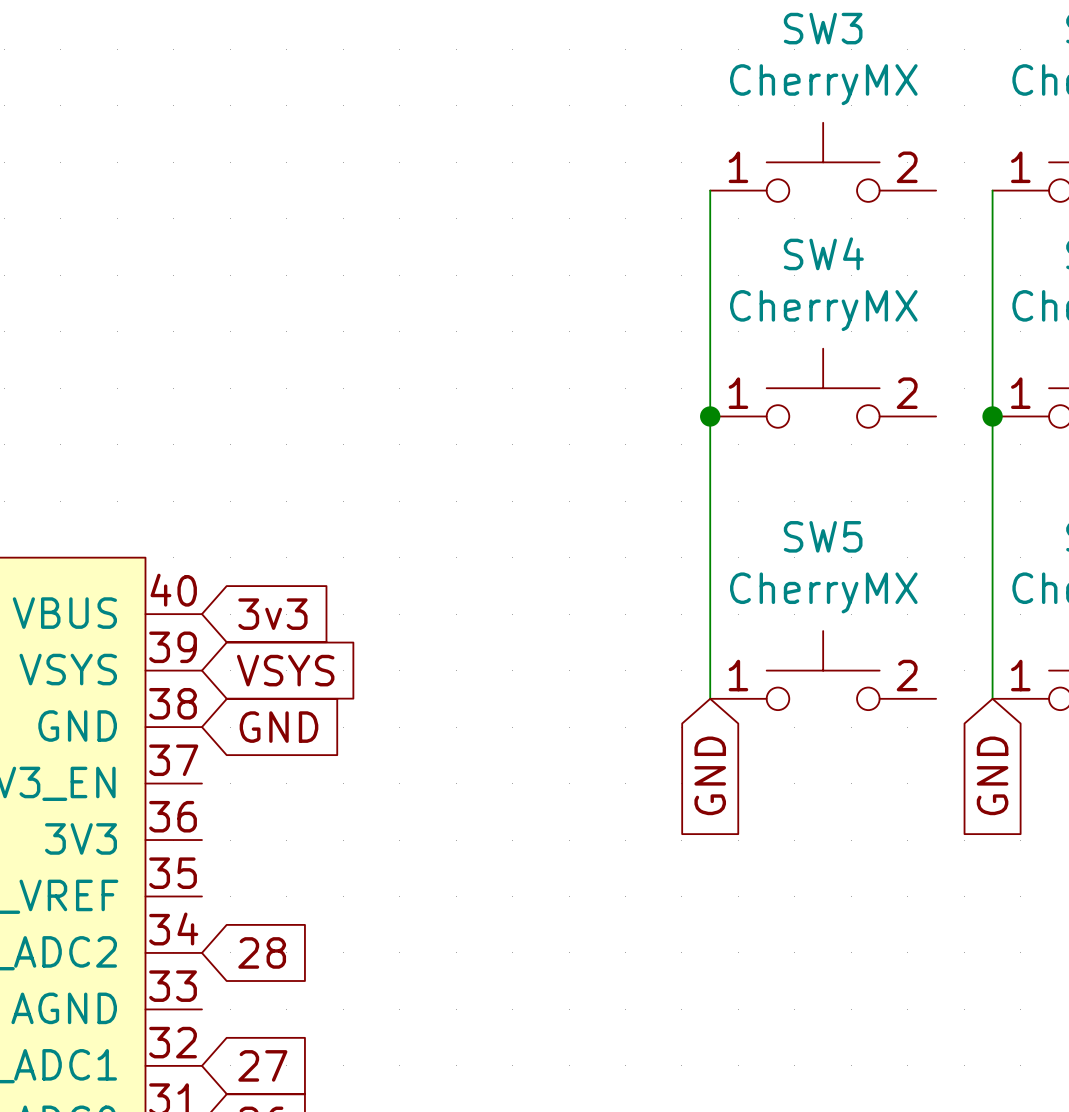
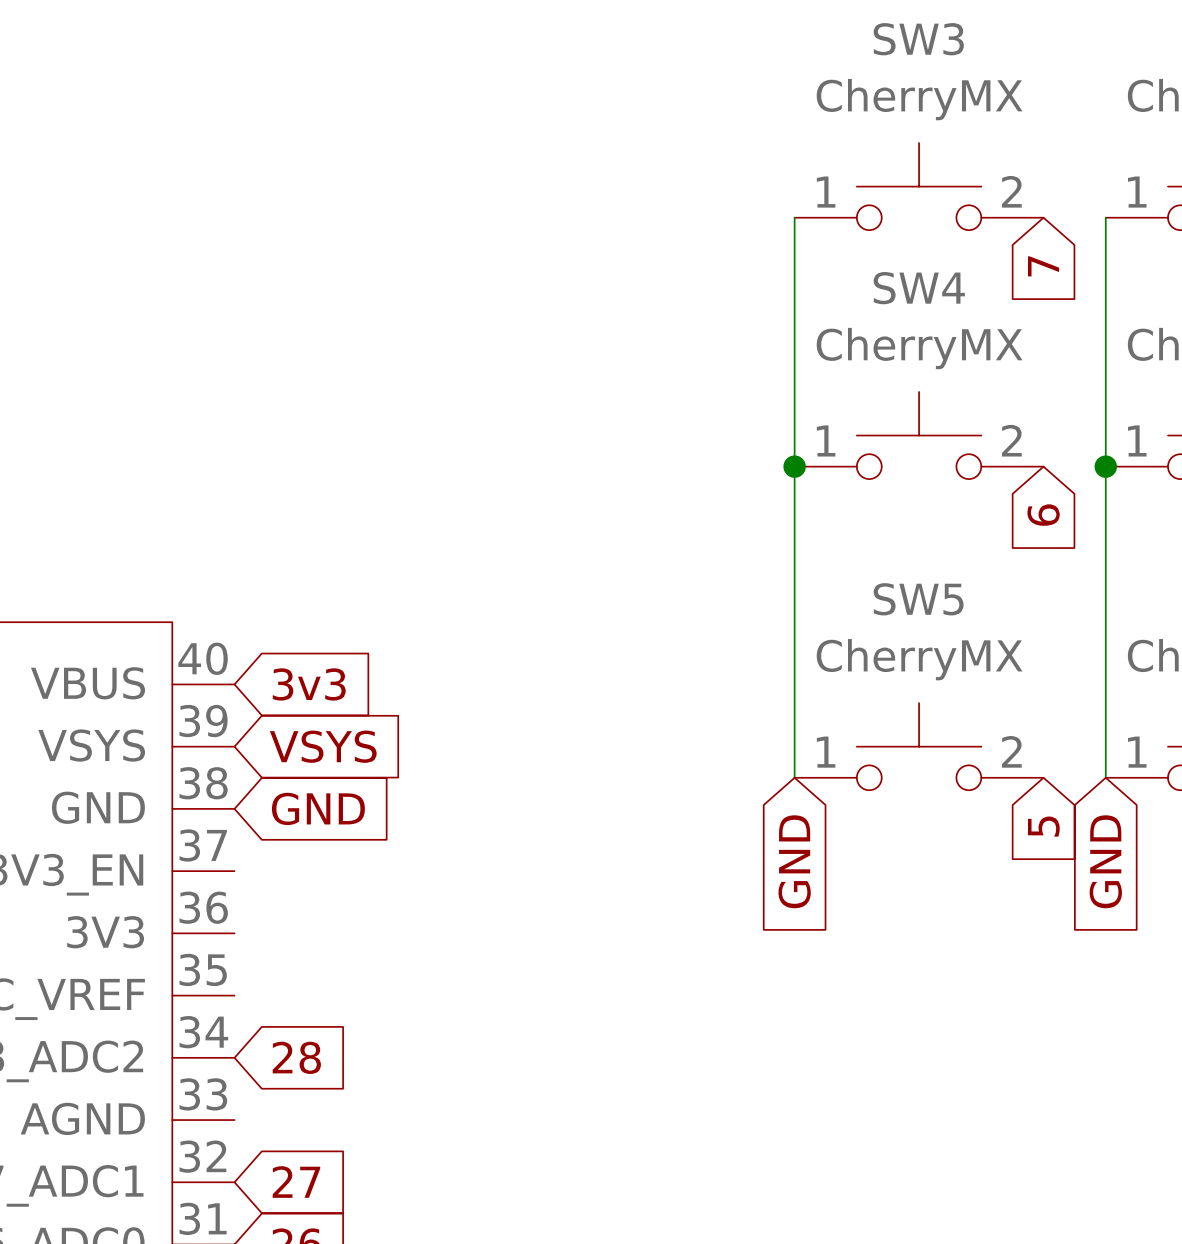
global label: none -> 7 (1043, 266)
global label: none -> 6 (1043, 515)
global label: none -> 5 (1043, 826)

